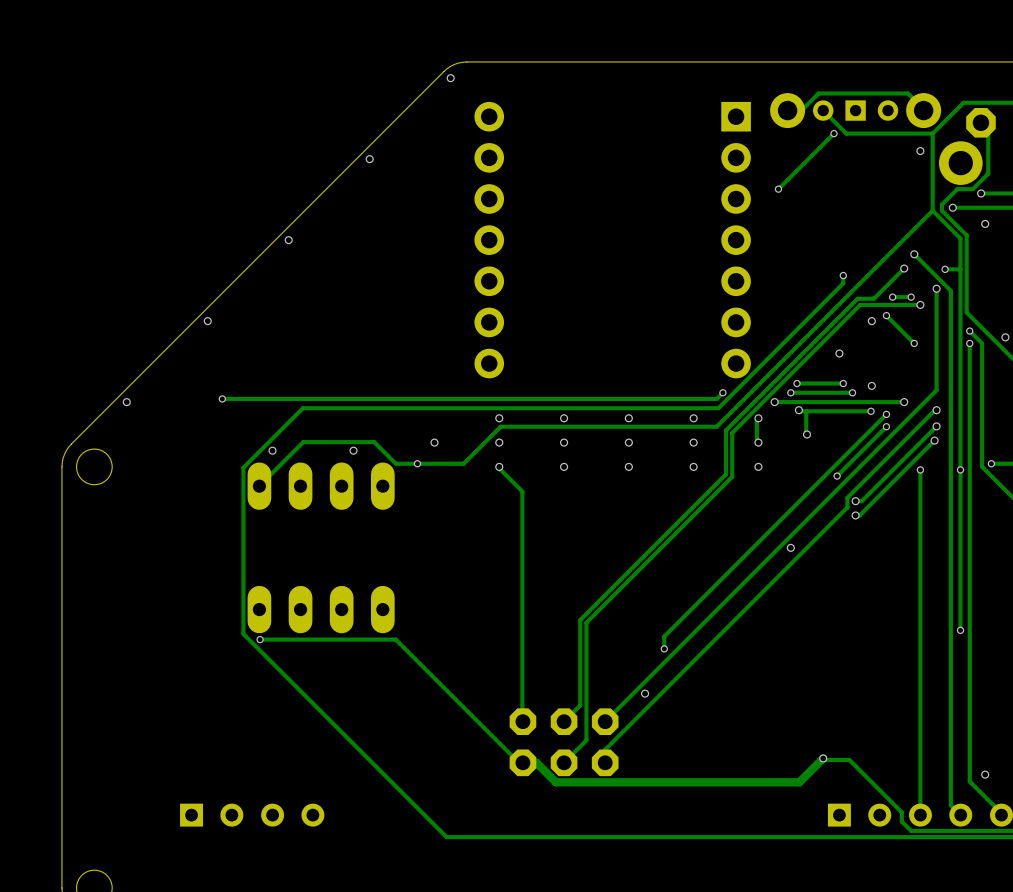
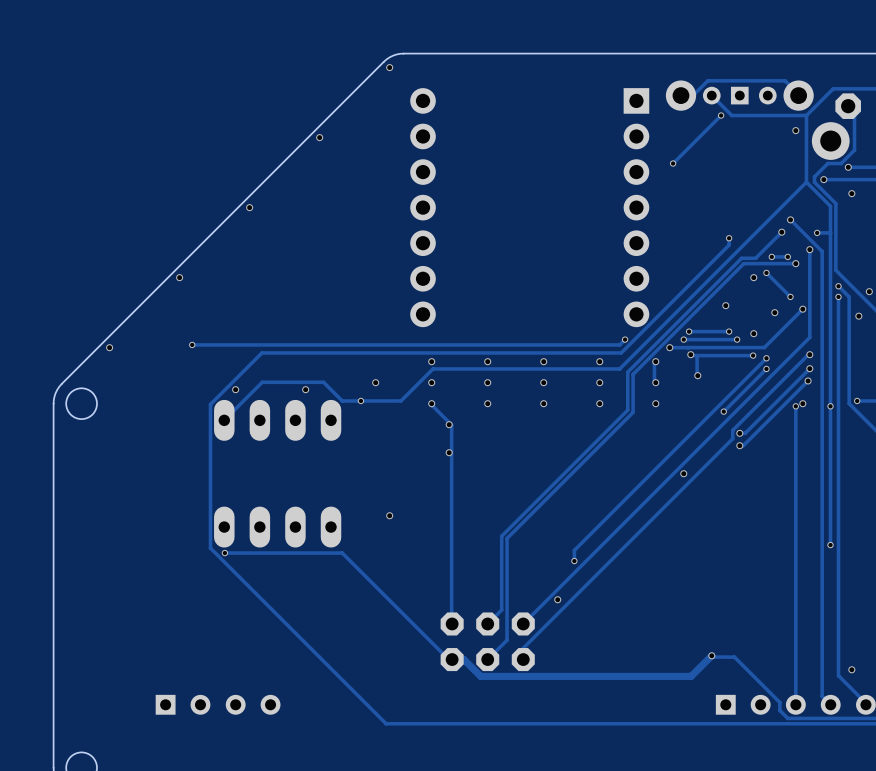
via: none -> (802, 309)
via: none -> (774, 312)
via: none -> (858, 316)
track: (904, 402) (802, 402) -> (802, 309) (764, 347) (693, 347)
via: (904, 402) -> none
via: none -> (802, 403)
via: none -> (449, 424)
via: none -> (449, 452)
via: none -> (389, 515)

